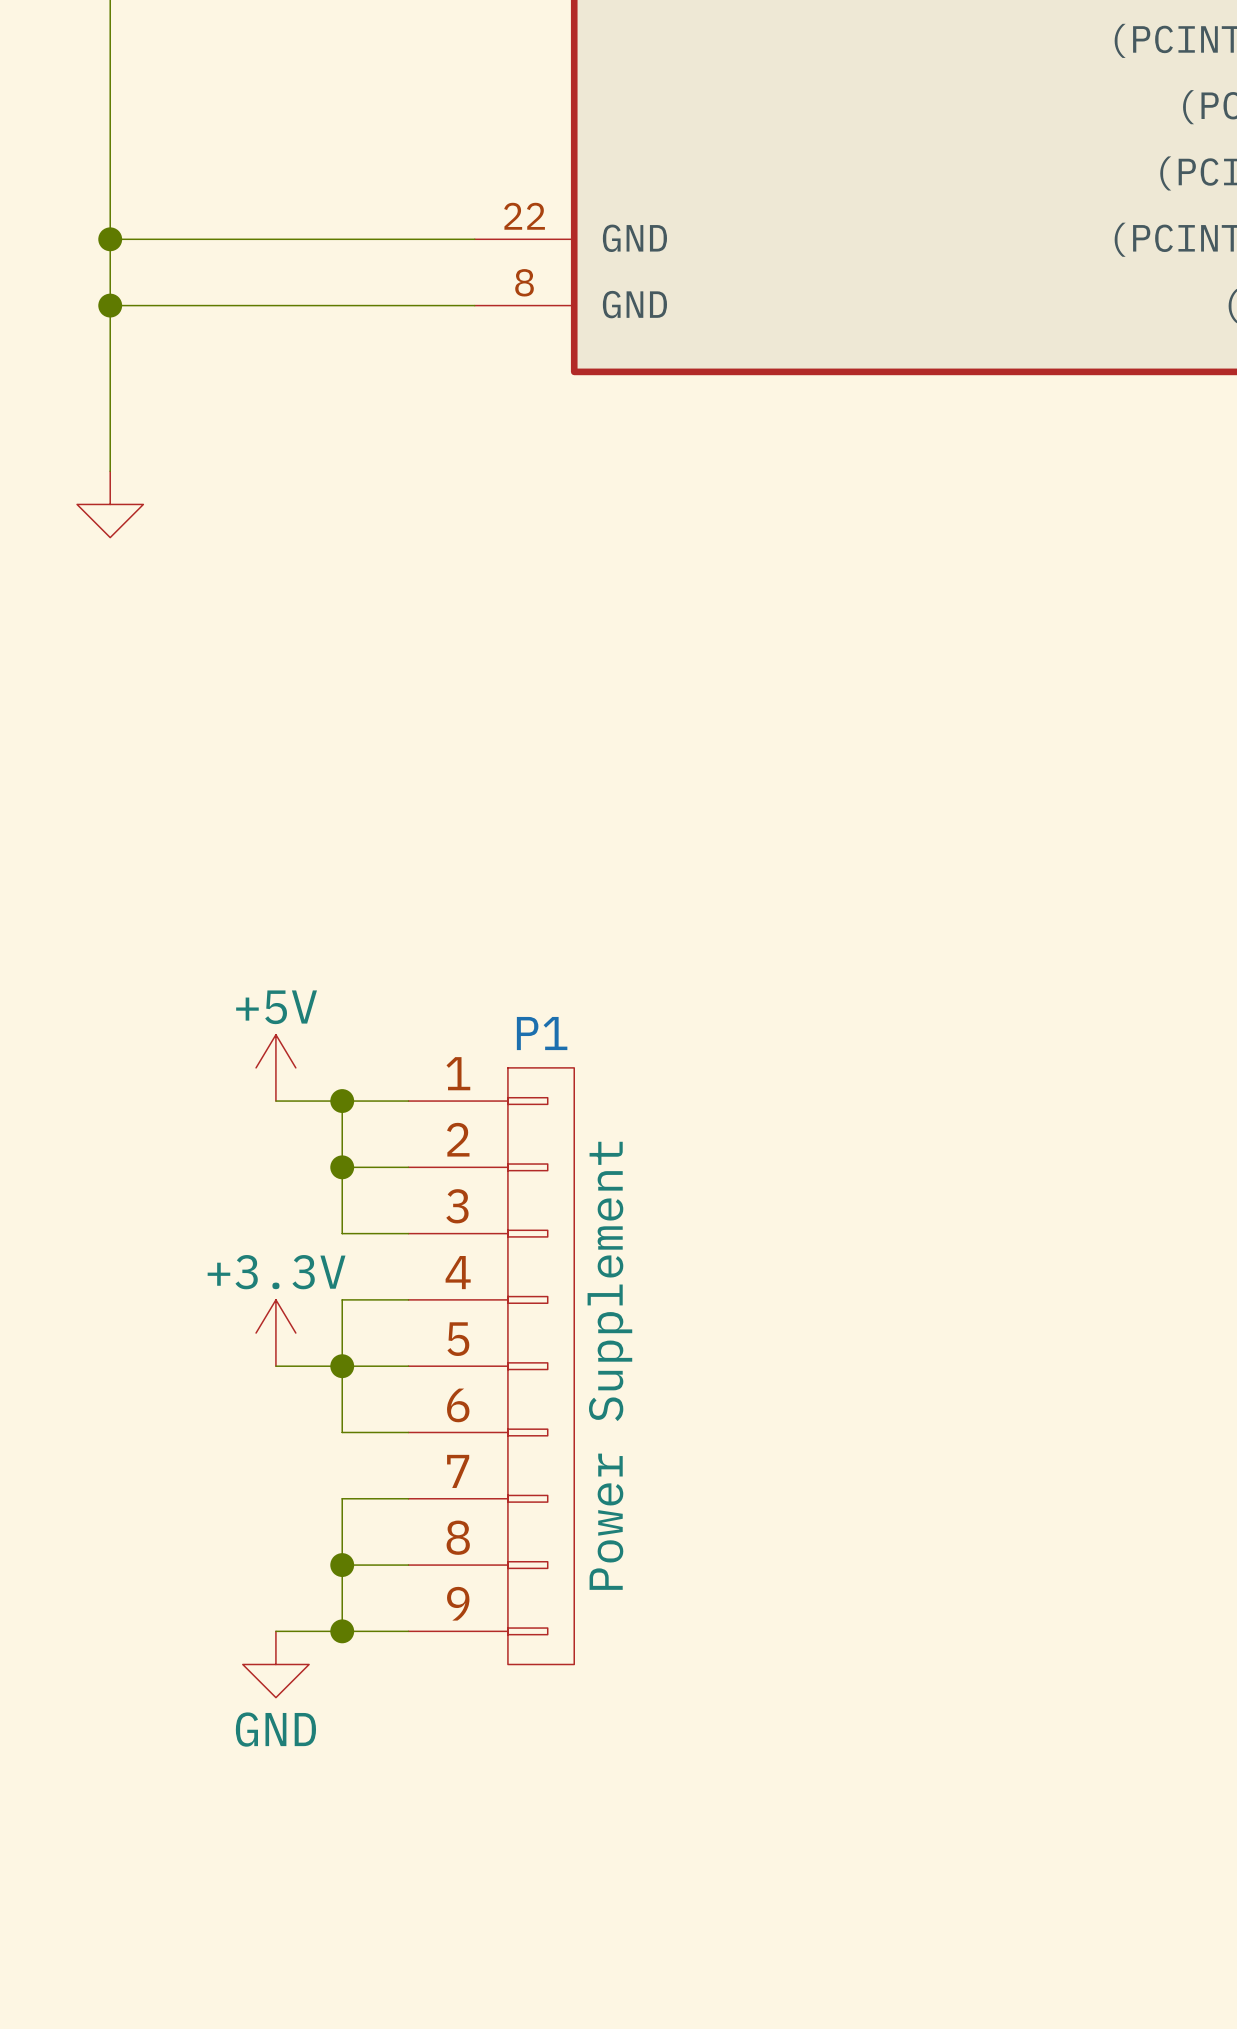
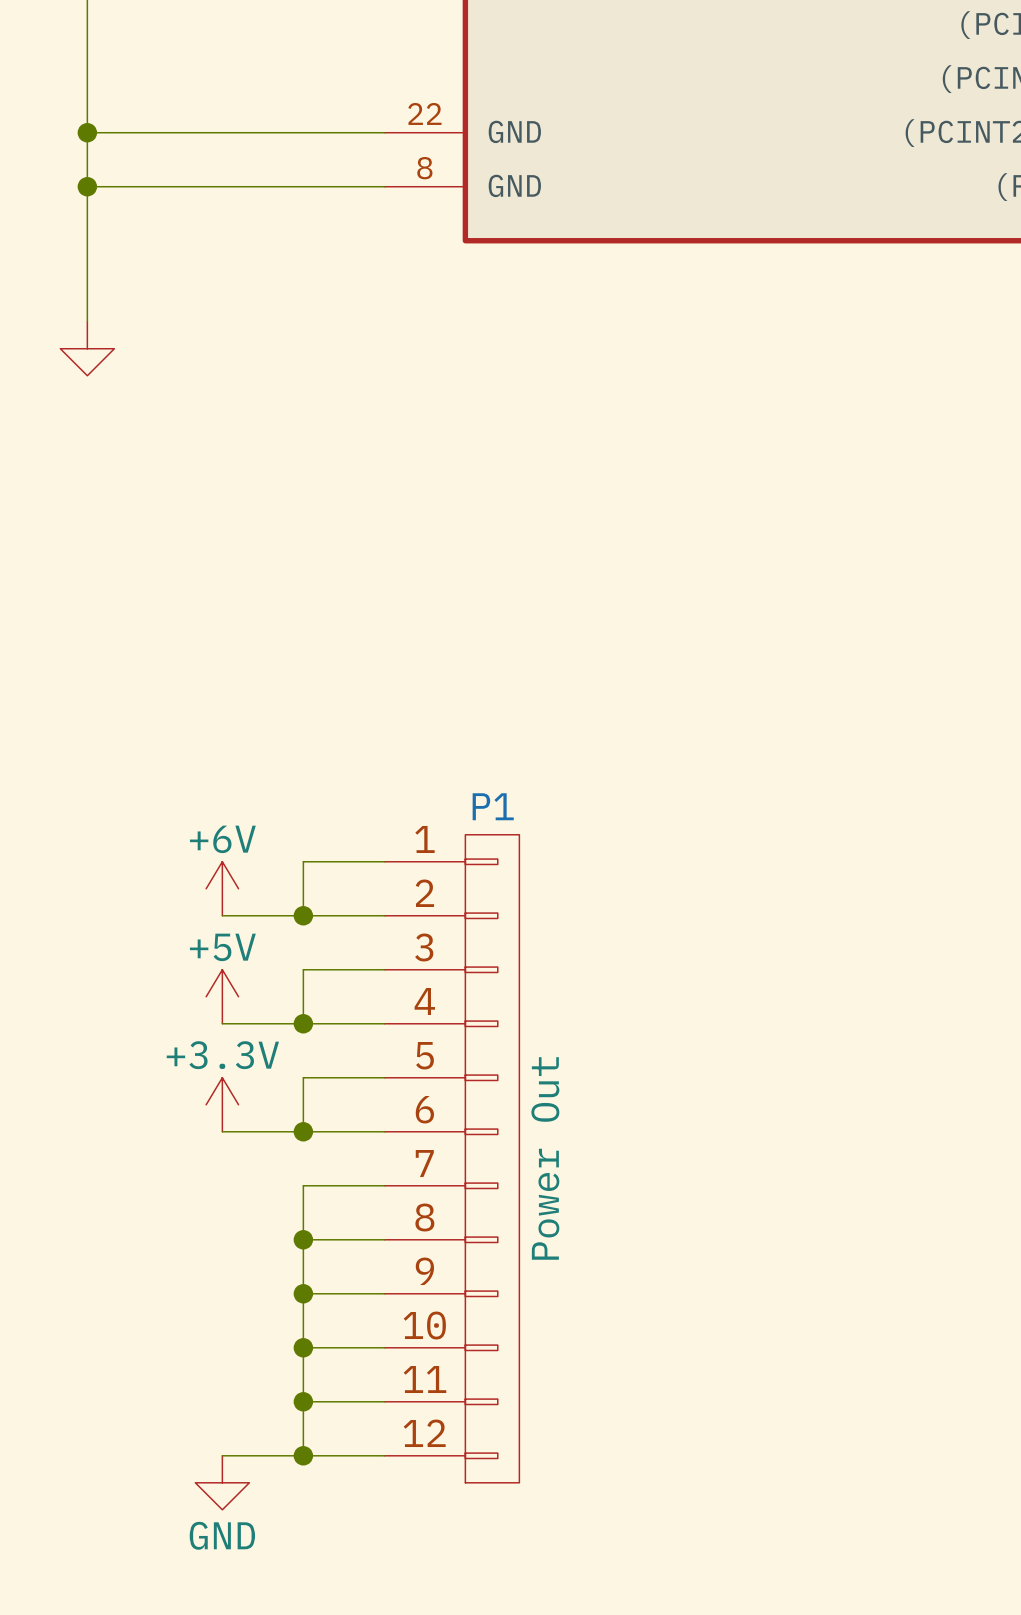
P1 name position: P1 (542, 1033) -> P1 (493, 806)
power symbol position: +5V (275, 1067) -> +5V (222, 996)
P1 symbol: [408, 1067, 575, 1665] -> [384, 834, 520, 1483]
wire: (275, 1101) (408, 1101) -> none
wire: (342, 1101) (342, 1233) (408, 1233) -> none
junction: (342, 1101) -> none
wire: none -> (384, 861) (303, 861) (303, 915)
power symbol: none -> +6V (222, 888)
wire: (342, 1167) (408, 1167) -> none
junction position: (342, 1167) -> (303, 915)
wire: none -> (222, 915) (384, 915)
wire: none -> (384, 969) (303, 969) (303, 1023)
wire: (408, 1299) (342, 1299) (342, 1432) (408, 1432) -> none
wire: none -> (222, 1023) (384, 1023)
power symbol position: +3.3V (275, 1333) -> +3.3V (222, 1104)
P1 value: Power Supplement (609, 1365) -> Power Out (545, 1158)
wire: (275, 1366) (408, 1366) -> none
junction position: (342, 1366) -> (303, 1023)
wire: none -> (384, 1077) (303, 1077) (303, 1131)
wire: none -> (222, 1131) (384, 1131)
junction: none -> (303, 1131)
wire: (408, 1498) (342, 1498) (342, 1631) -> none
wire: none -> (384, 1185) (303, 1185) (303, 1455)
wire: (342, 1565) (408, 1565) -> none
junction: (342, 1565) -> none
wire: none -> (303, 1239) (384, 1239)
junction: none -> (303, 1239)
wire: (275, 1631) (408, 1631) -> none
junction: (342, 1631) -> none
power symbol position: GND (275, 1664) -> GND (222, 1482)
wire: none -> (303, 1293) (384, 1293)
junction: none -> (303, 1293)
wire: none -> (303, 1347) (384, 1347)
junction: none -> (303, 1347)
wire: none -> (303, 1401) (384, 1401)
junction: none -> (303, 1401)
wire: none -> (222, 1455) (384, 1455)
junction: none -> (303, 1455)

